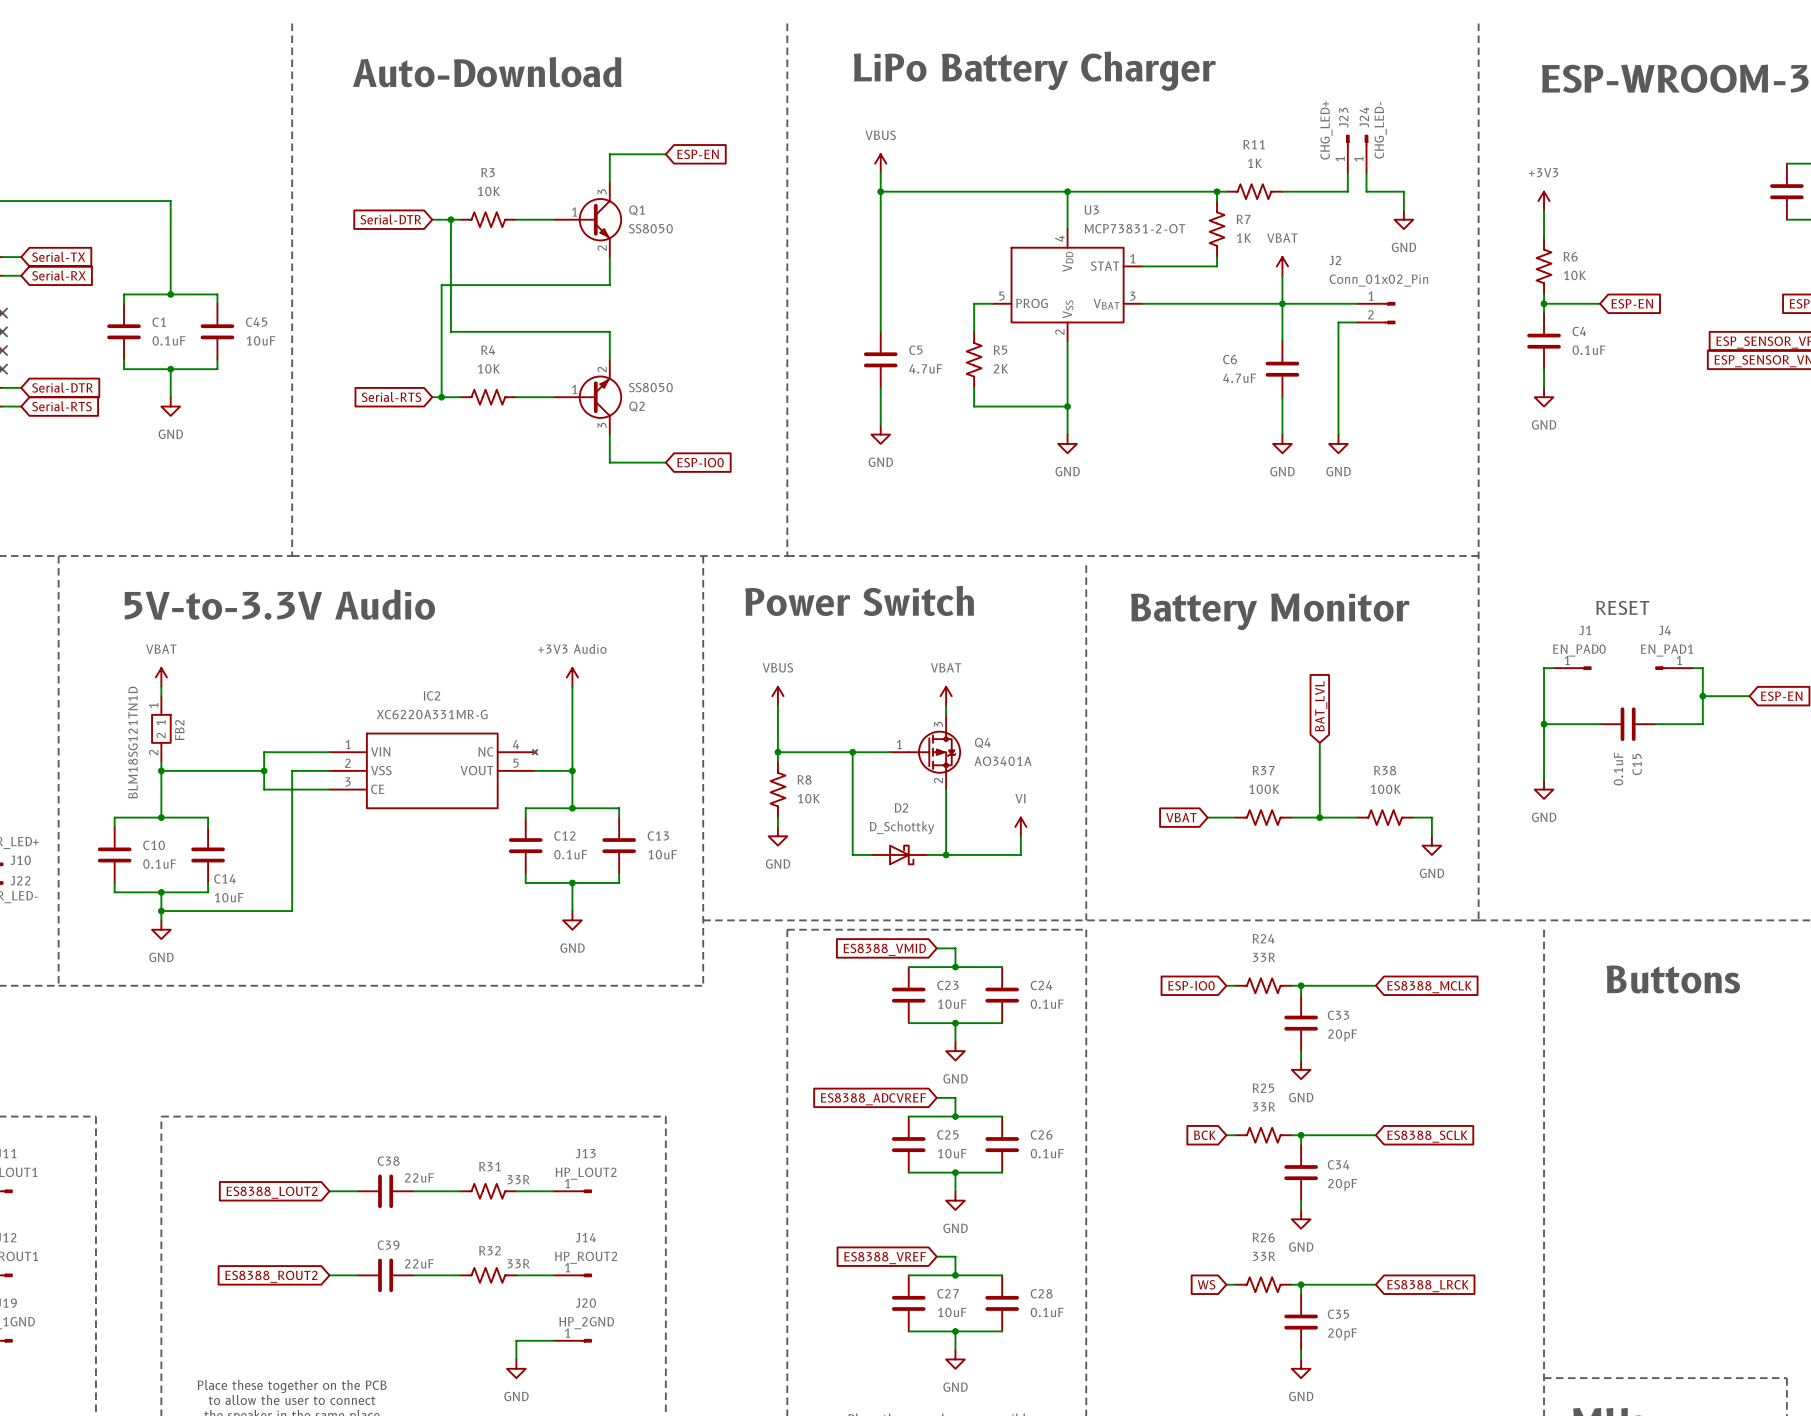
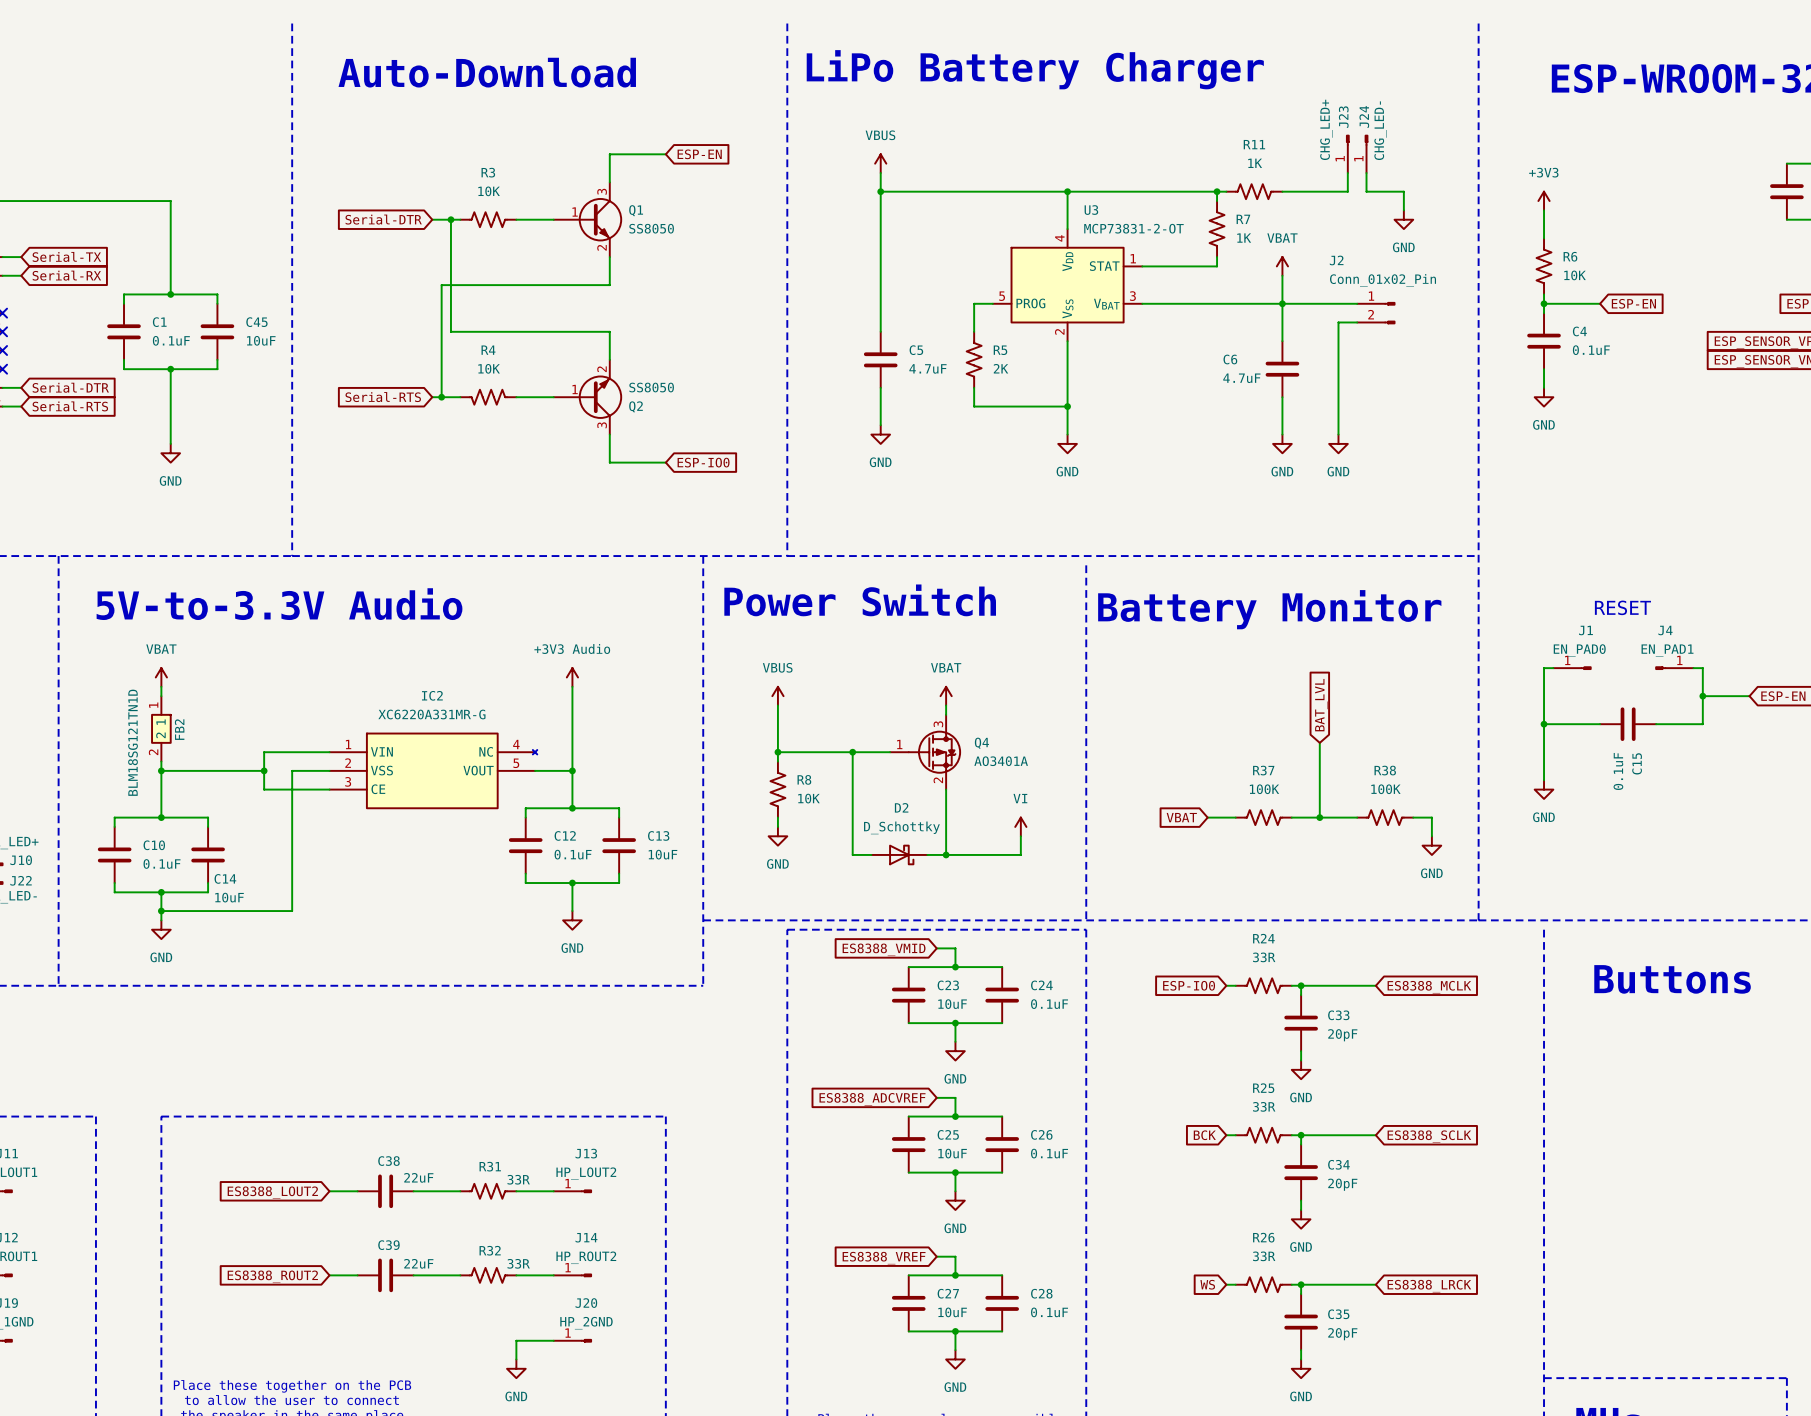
wire: none -> (170, 397) (170, 443)
R4 flip: as is (488, 397) -> left-right (488, 397)
power symbol position: GND (170, 406) -> GND (170, 453)

